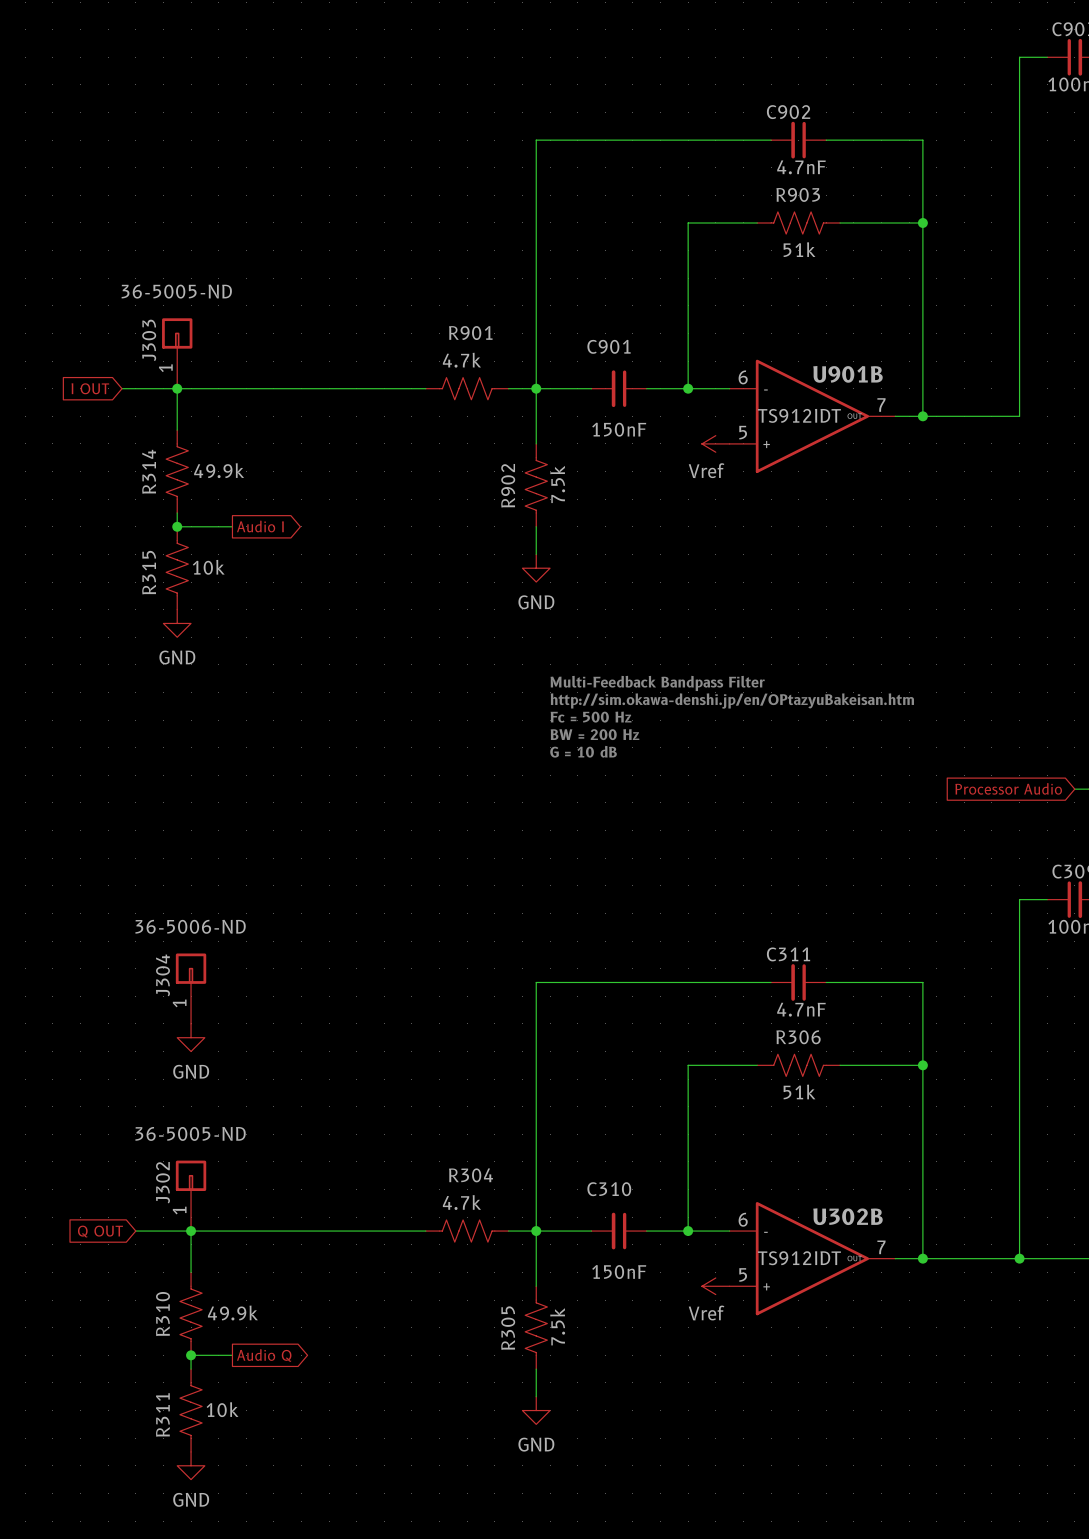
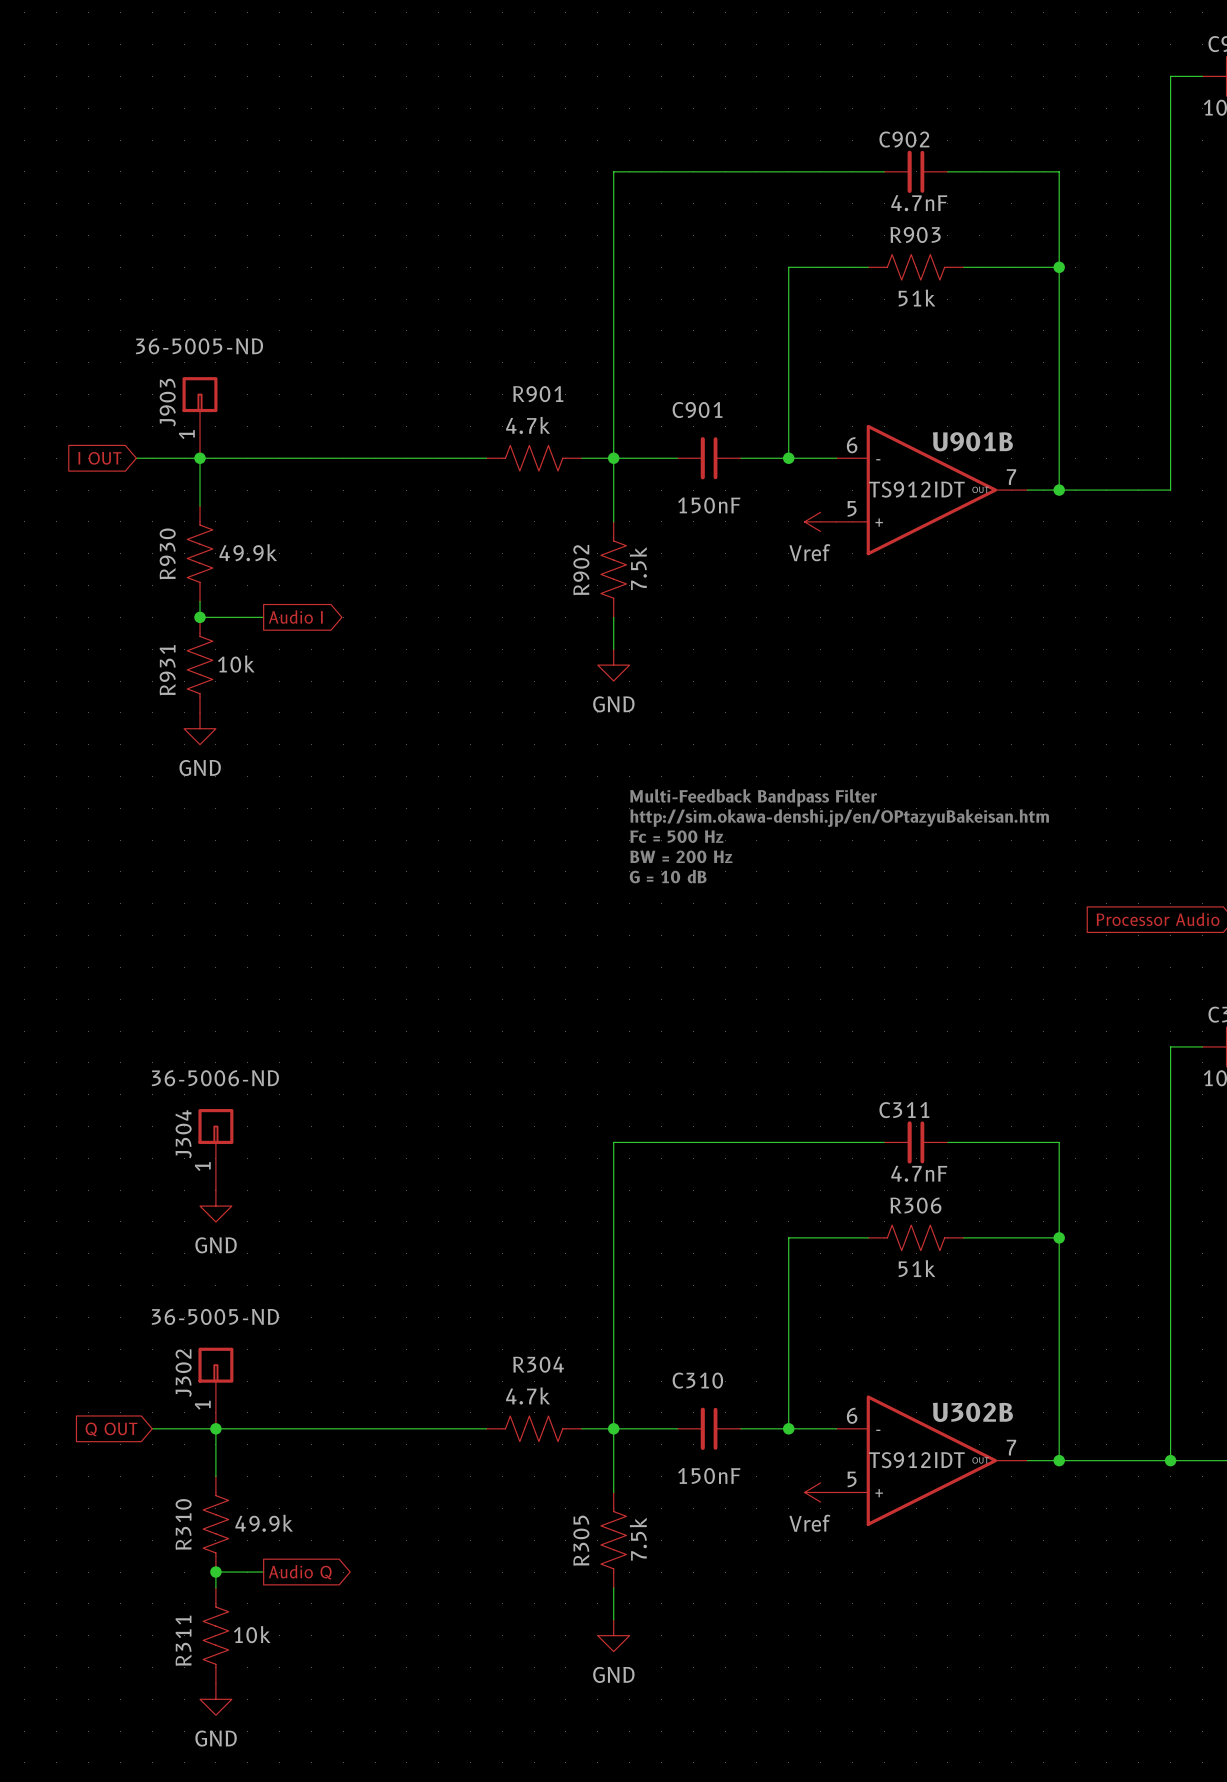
J303 name: J303 (149, 340) -> J903 (167, 402)
R314 name: R314 (149, 471) -> R930 (167, 553)
R315 name: R315 (149, 572) -> R931 (167, 670)

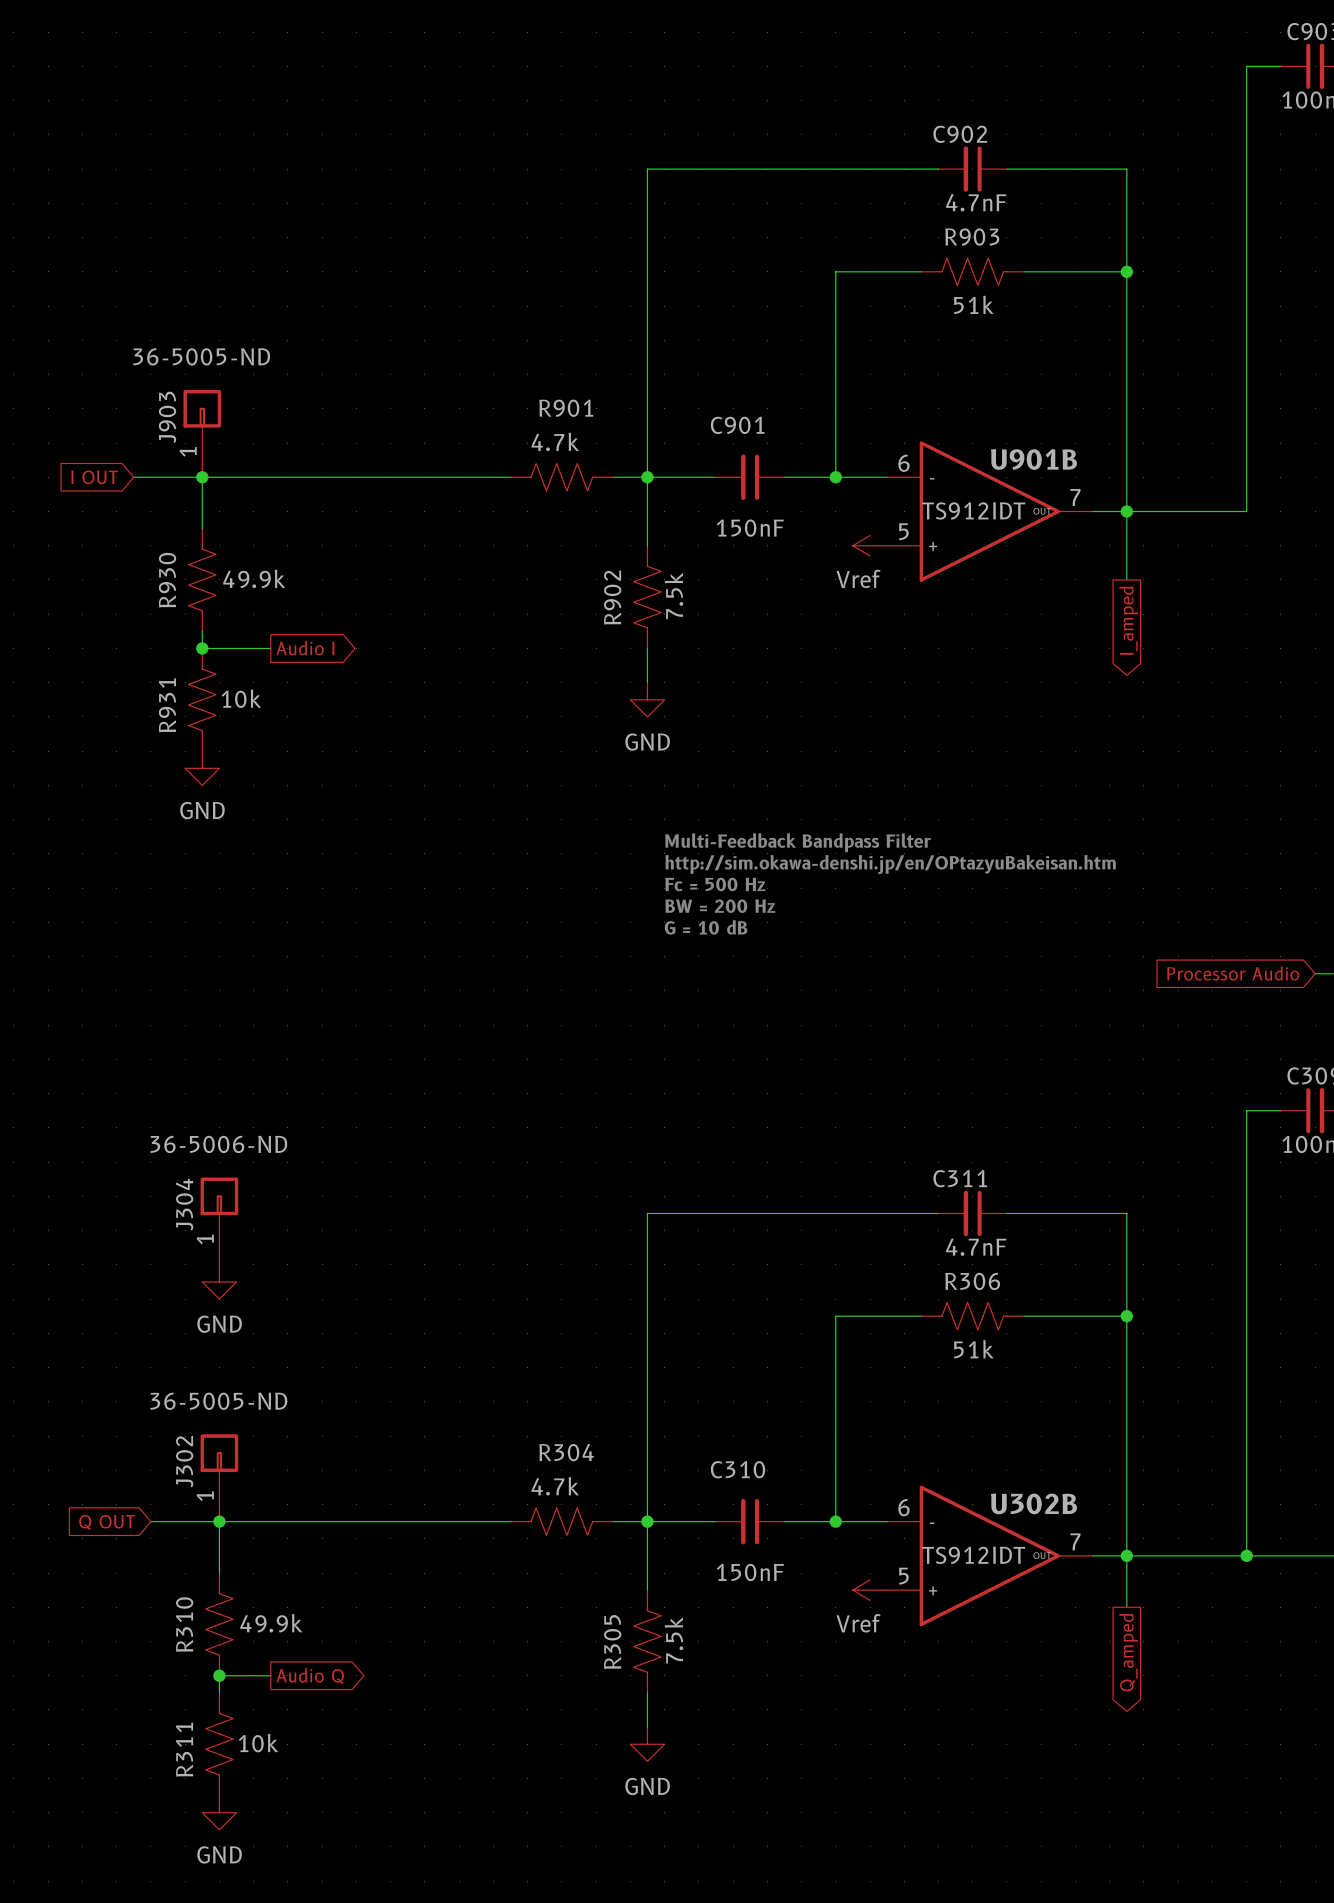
wire: none -> (1126, 511) (1126, 579)
global label: none -> I_amped (1128, 620)
wire: none -> (1126, 1555) (1126, 1607)
global label: none -> Q_amped (1128, 1652)

